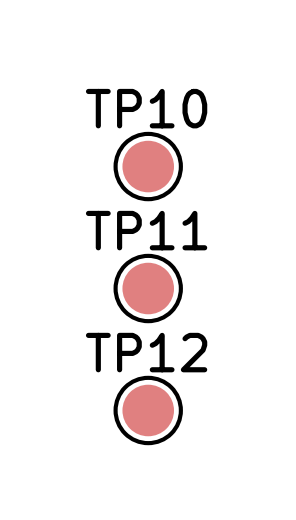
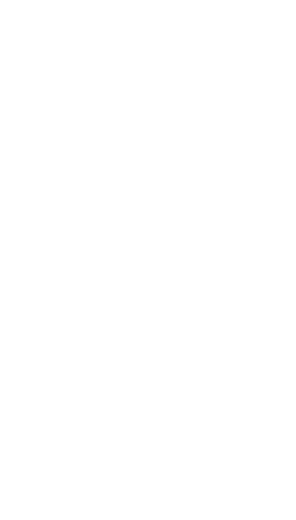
TP10: (148, 166) -> none
TP11: (148, 288) -> none
TP12: (148, 410) -> none

